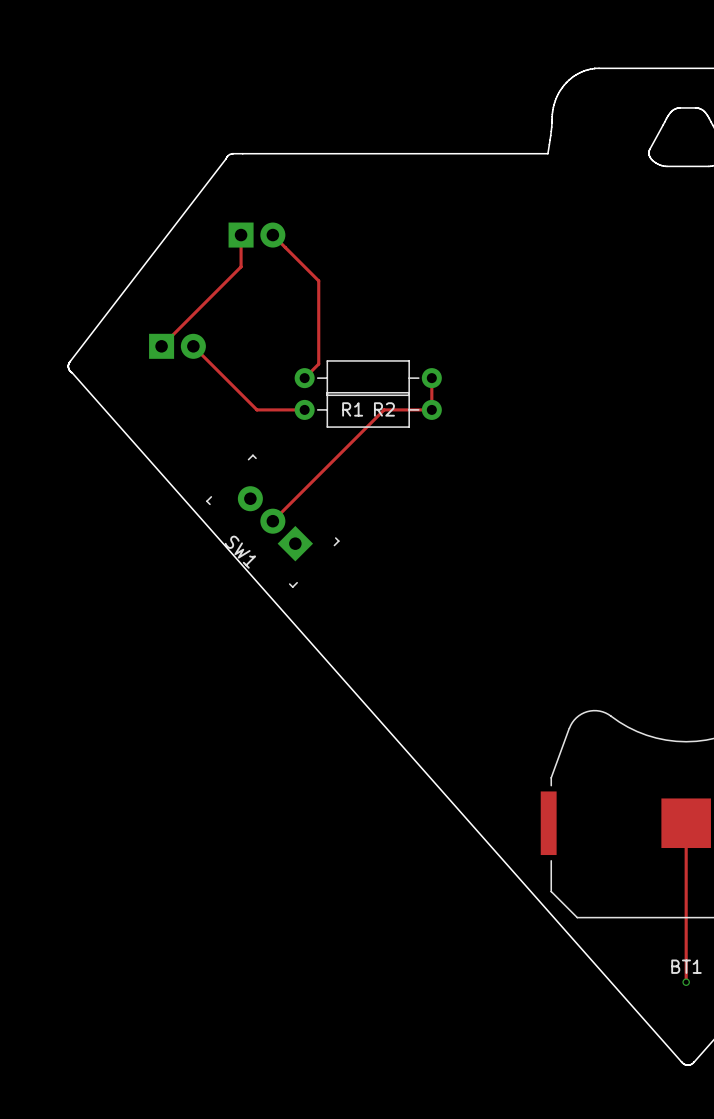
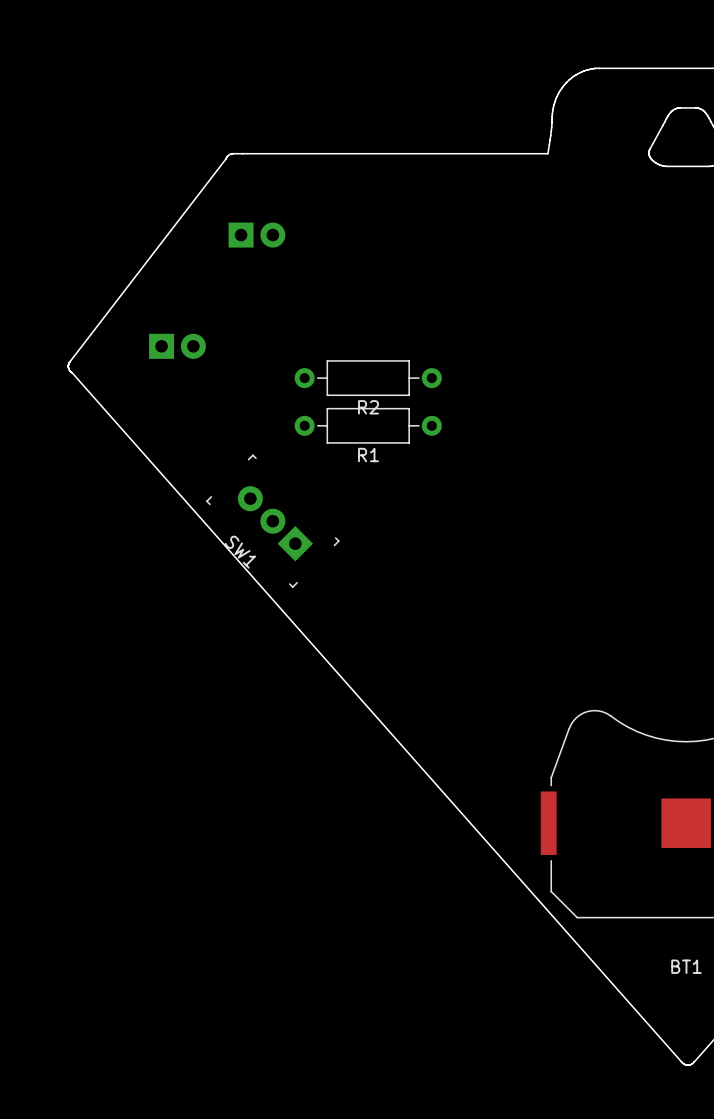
track: (241, 235) (241, 266) (161, 346) -> none
track: (272, 235) (318, 280) (318, 364) (304, 378) -> none
track: (193, 346) (256, 409) (304, 409) -> none
track: (431, 378) (431, 409) (384, 409) (272, 521) -> none
R1 name: R1 (352, 409) -> R2 (368, 407)
R2: (368, 409) -> none
R1: none -> (368, 425)
track: (686, 823) (686, 982) -> none
via: (686, 982) -> none

